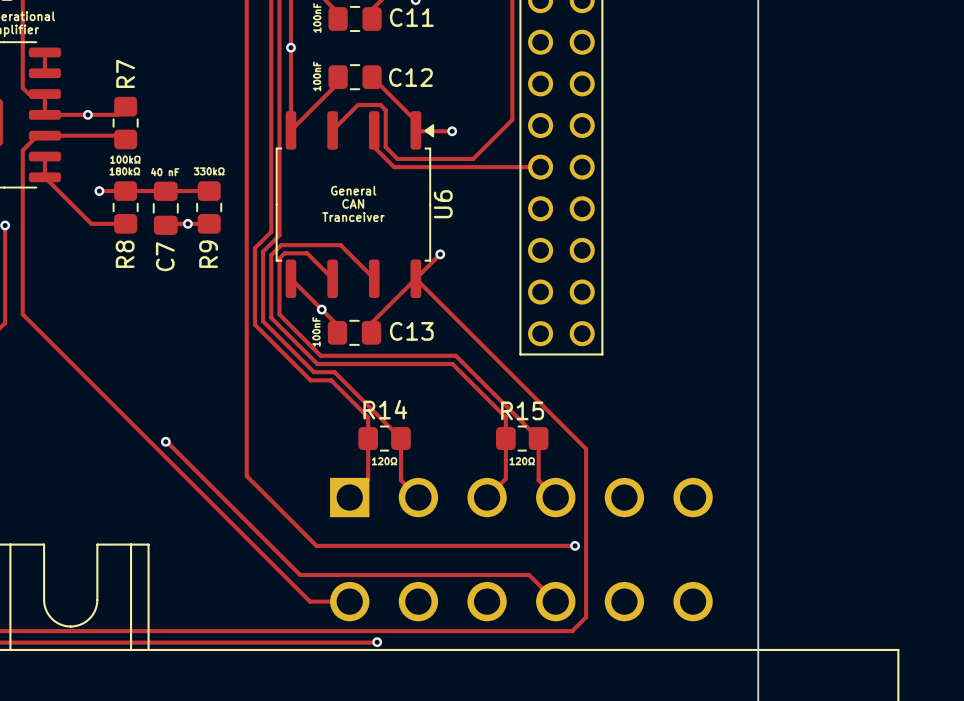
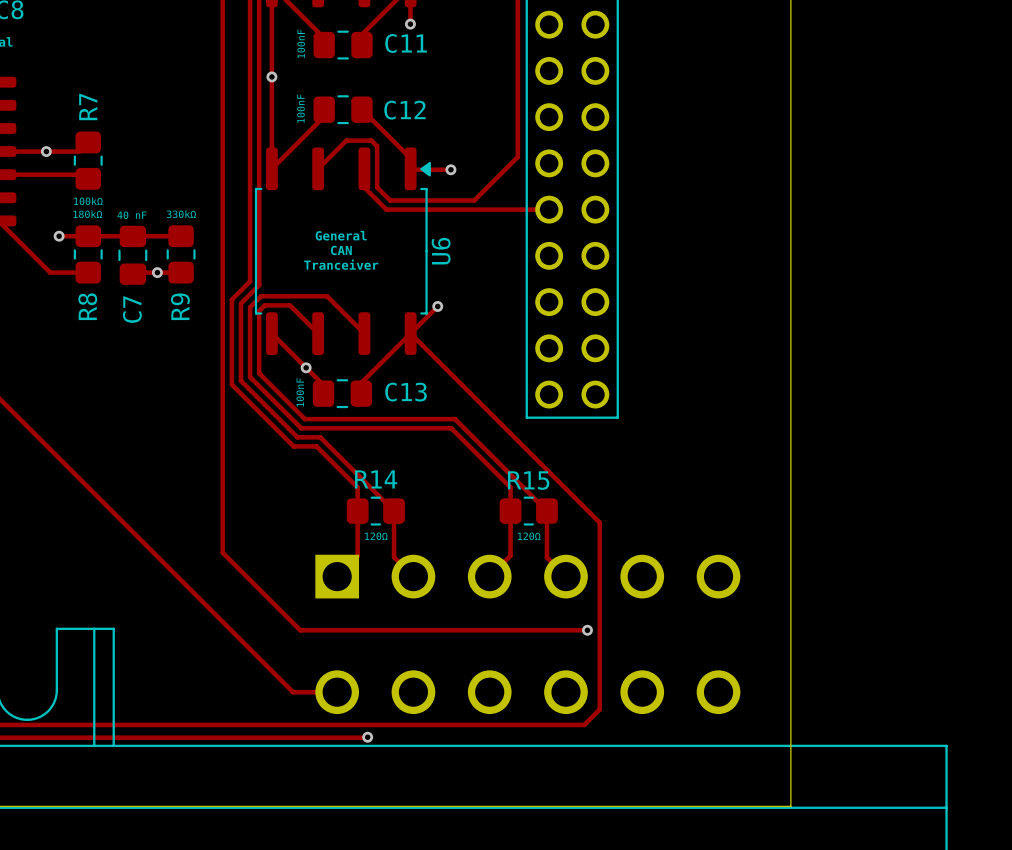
track: (165, 441) (300, 574) (529, 574) (555, 601) -> none
via: (165, 441) -> none

